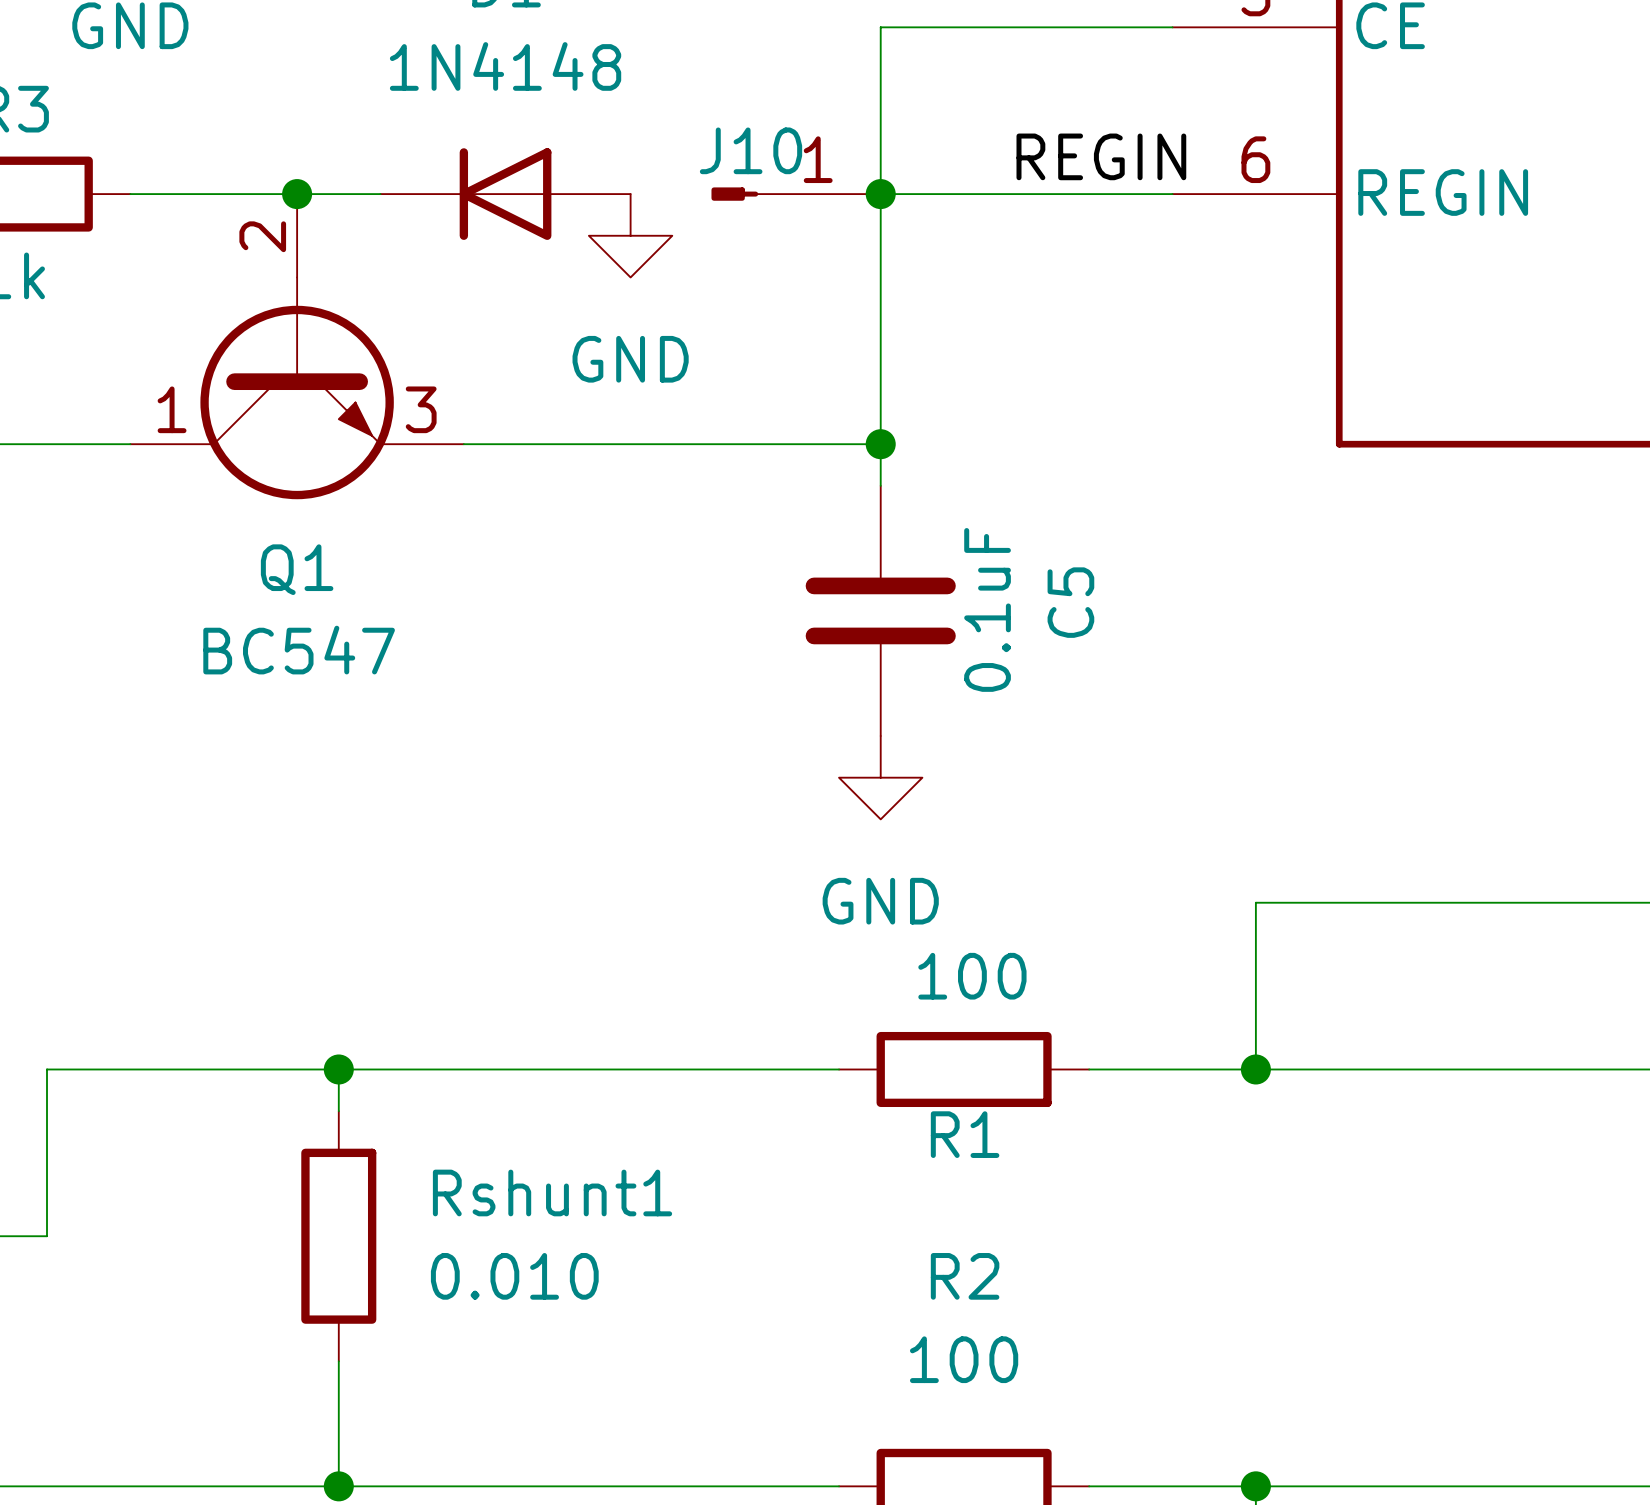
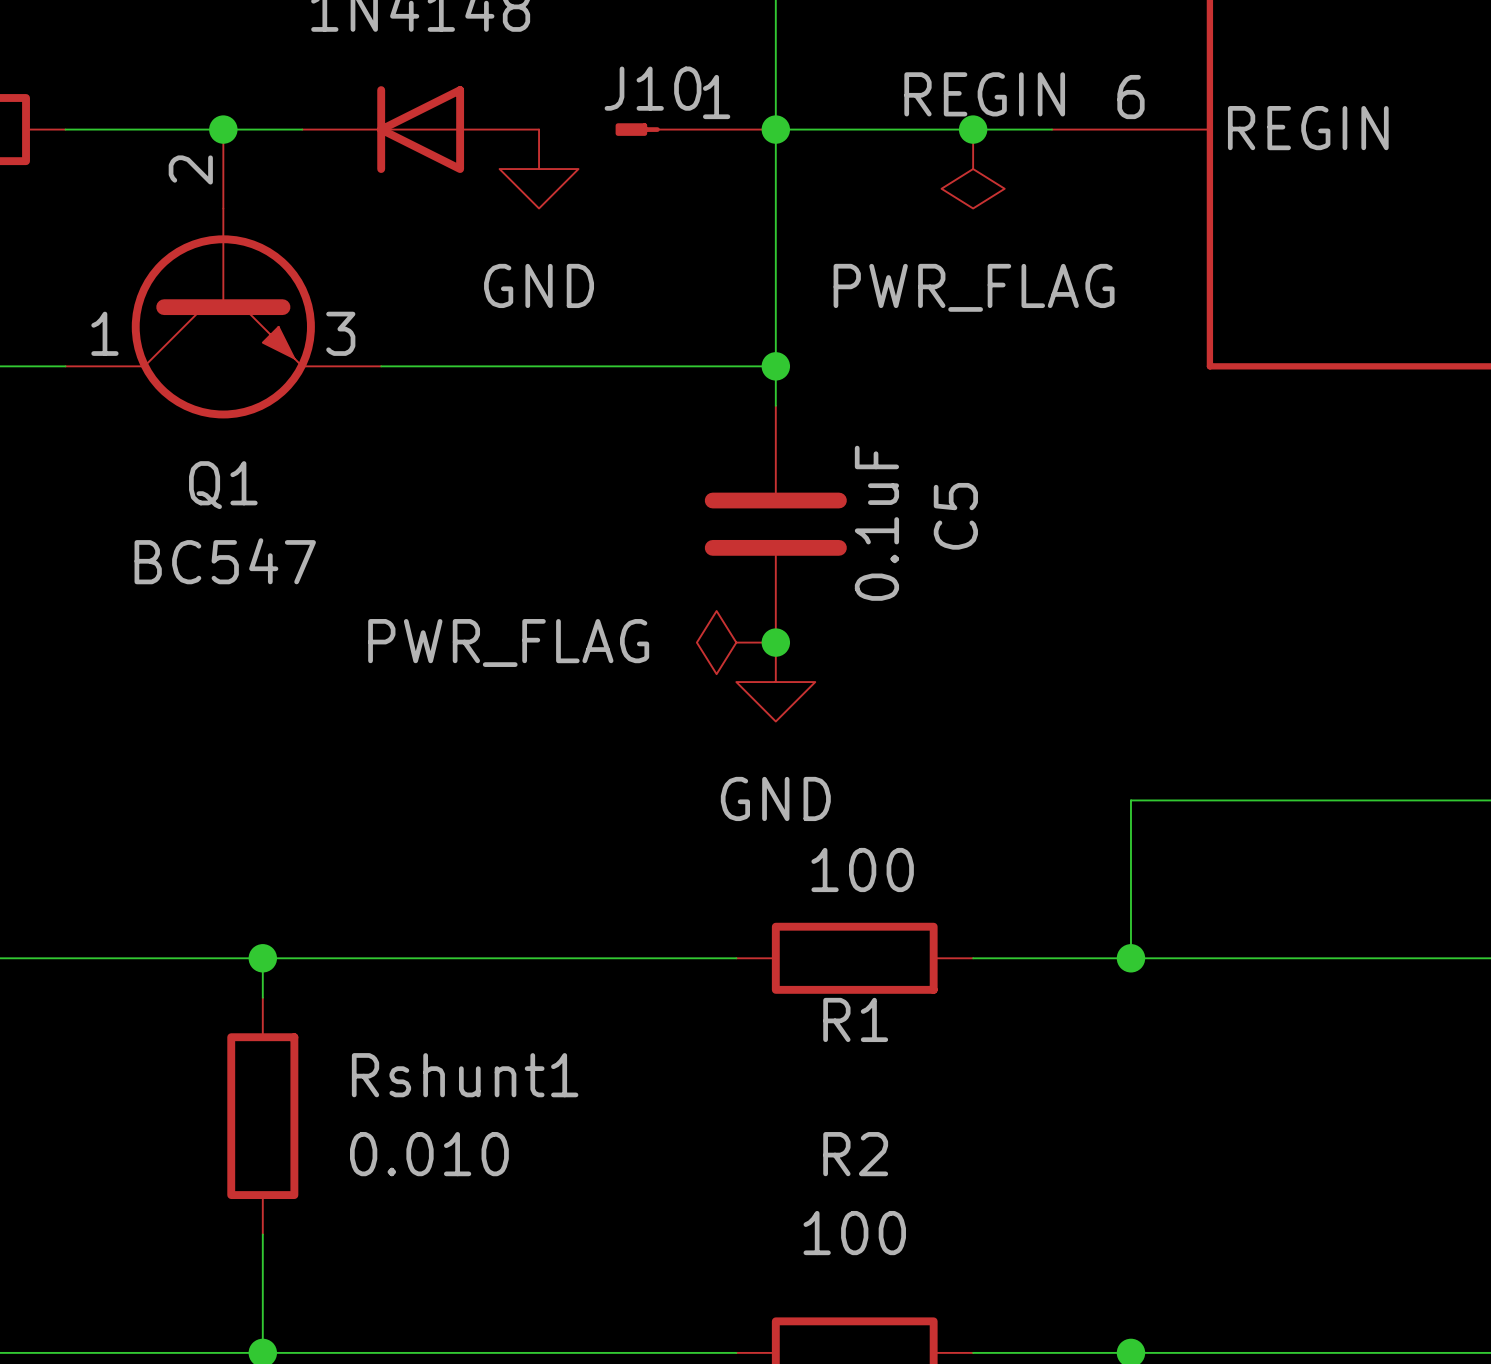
junction: none -> (973, 129)
power symbol: none -> PWR_FLAG (973, 169)
power symbol: none -> PWR_FLAG (736, 642)
junction: none -> (775, 642)

